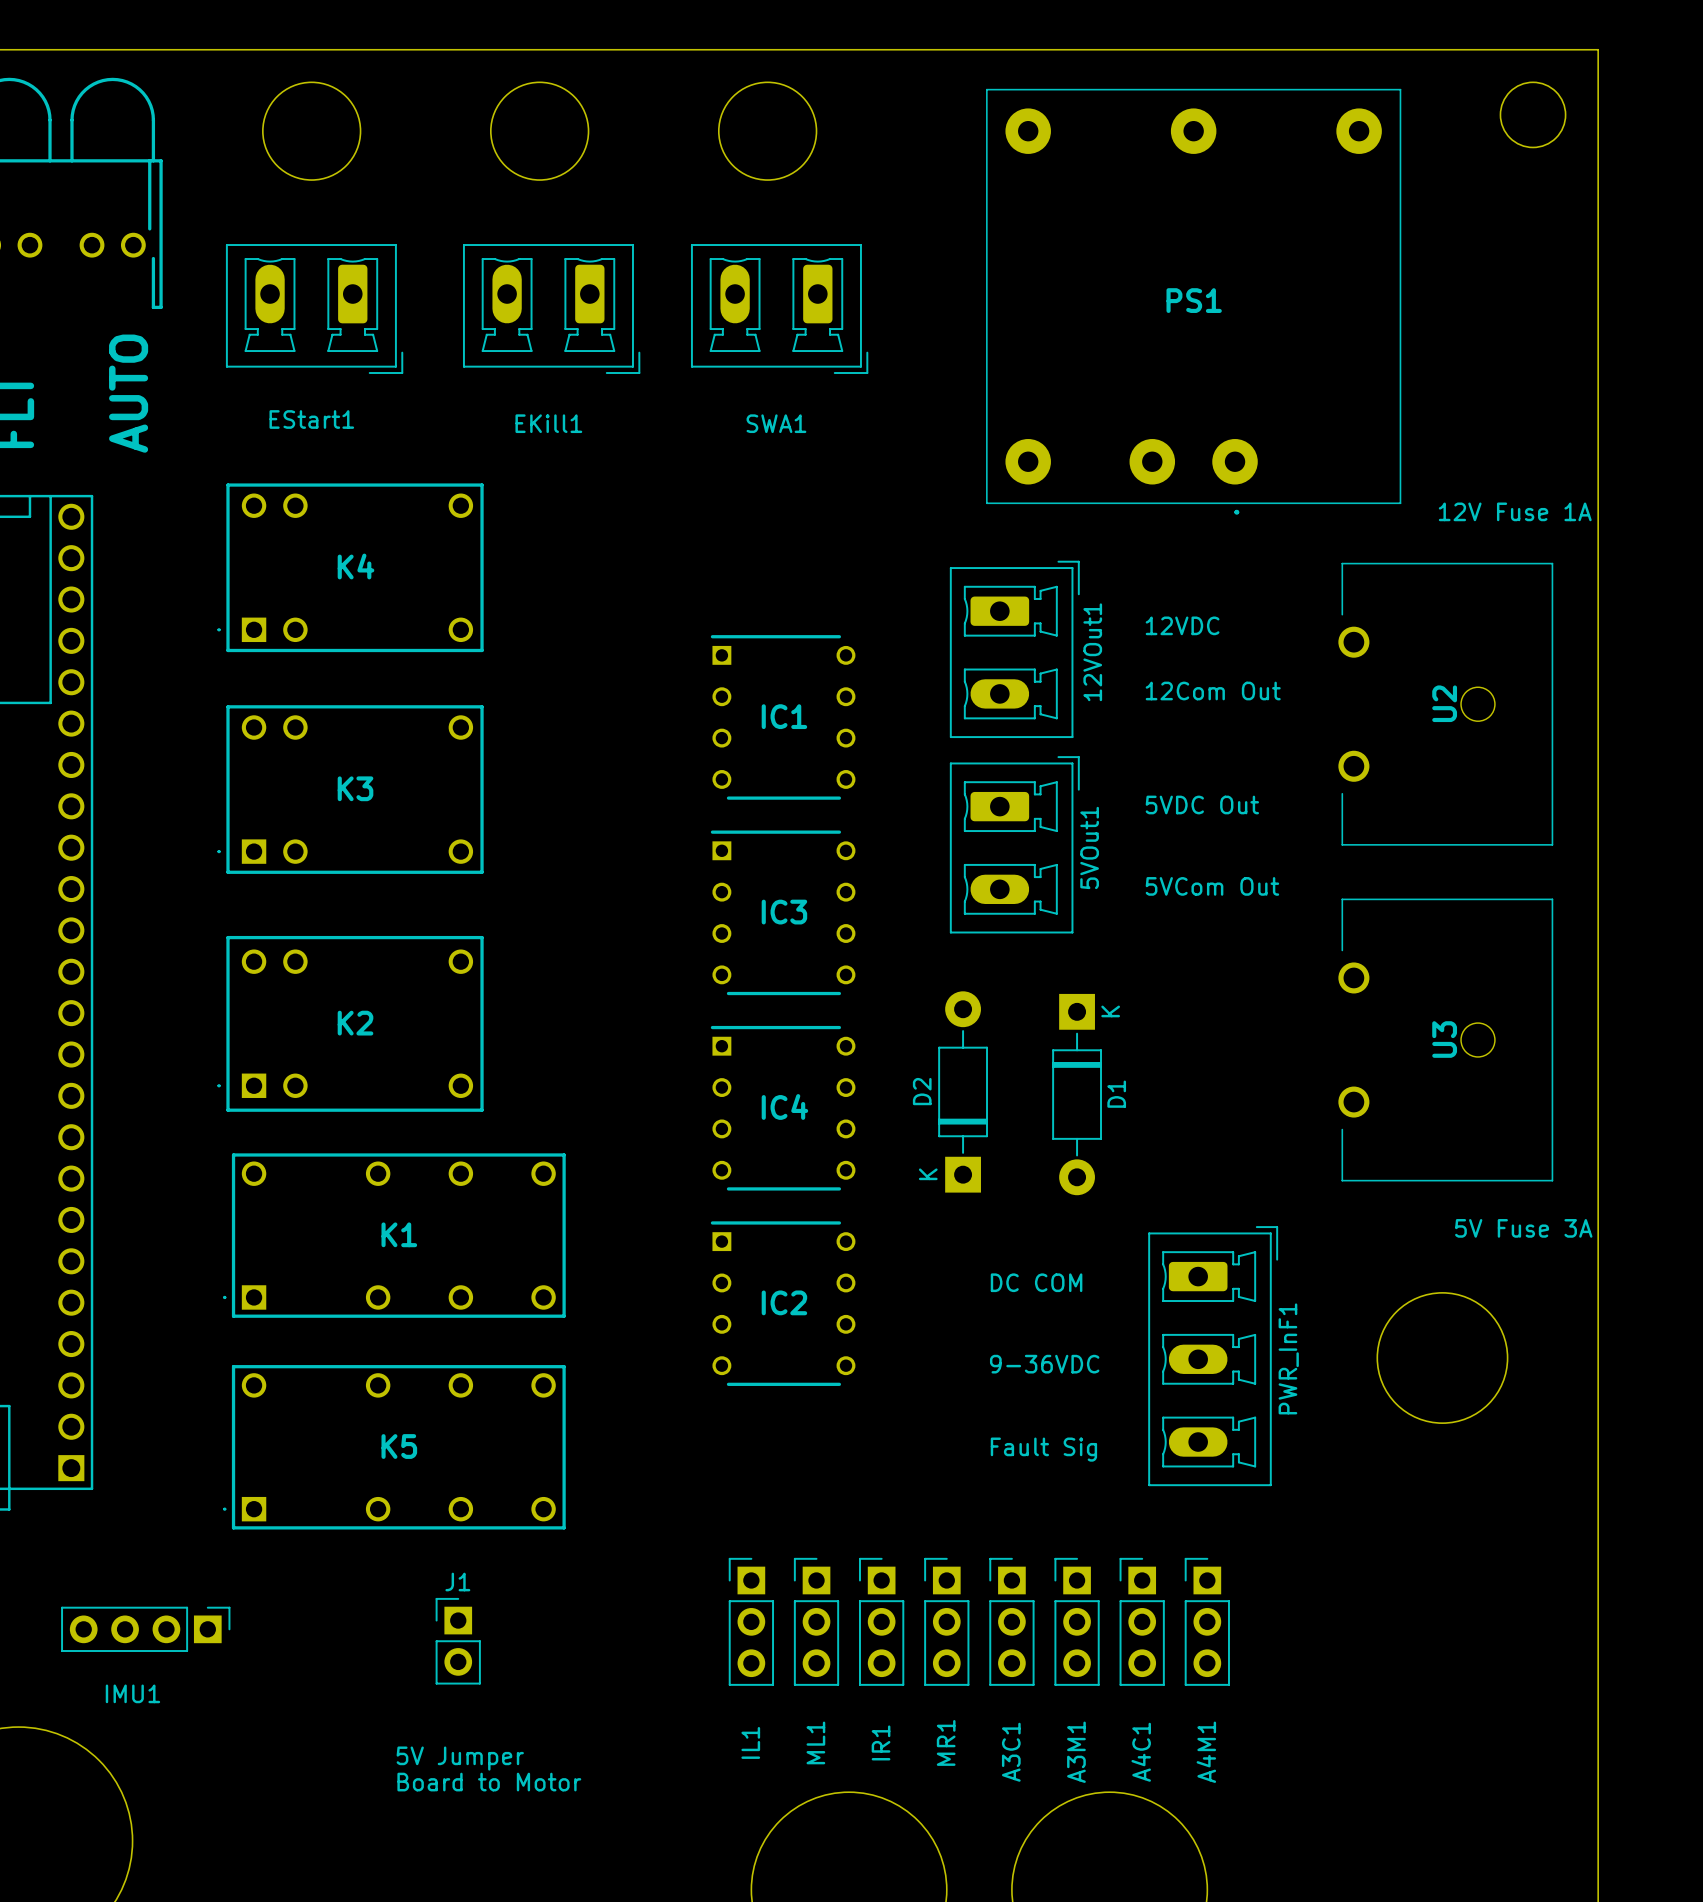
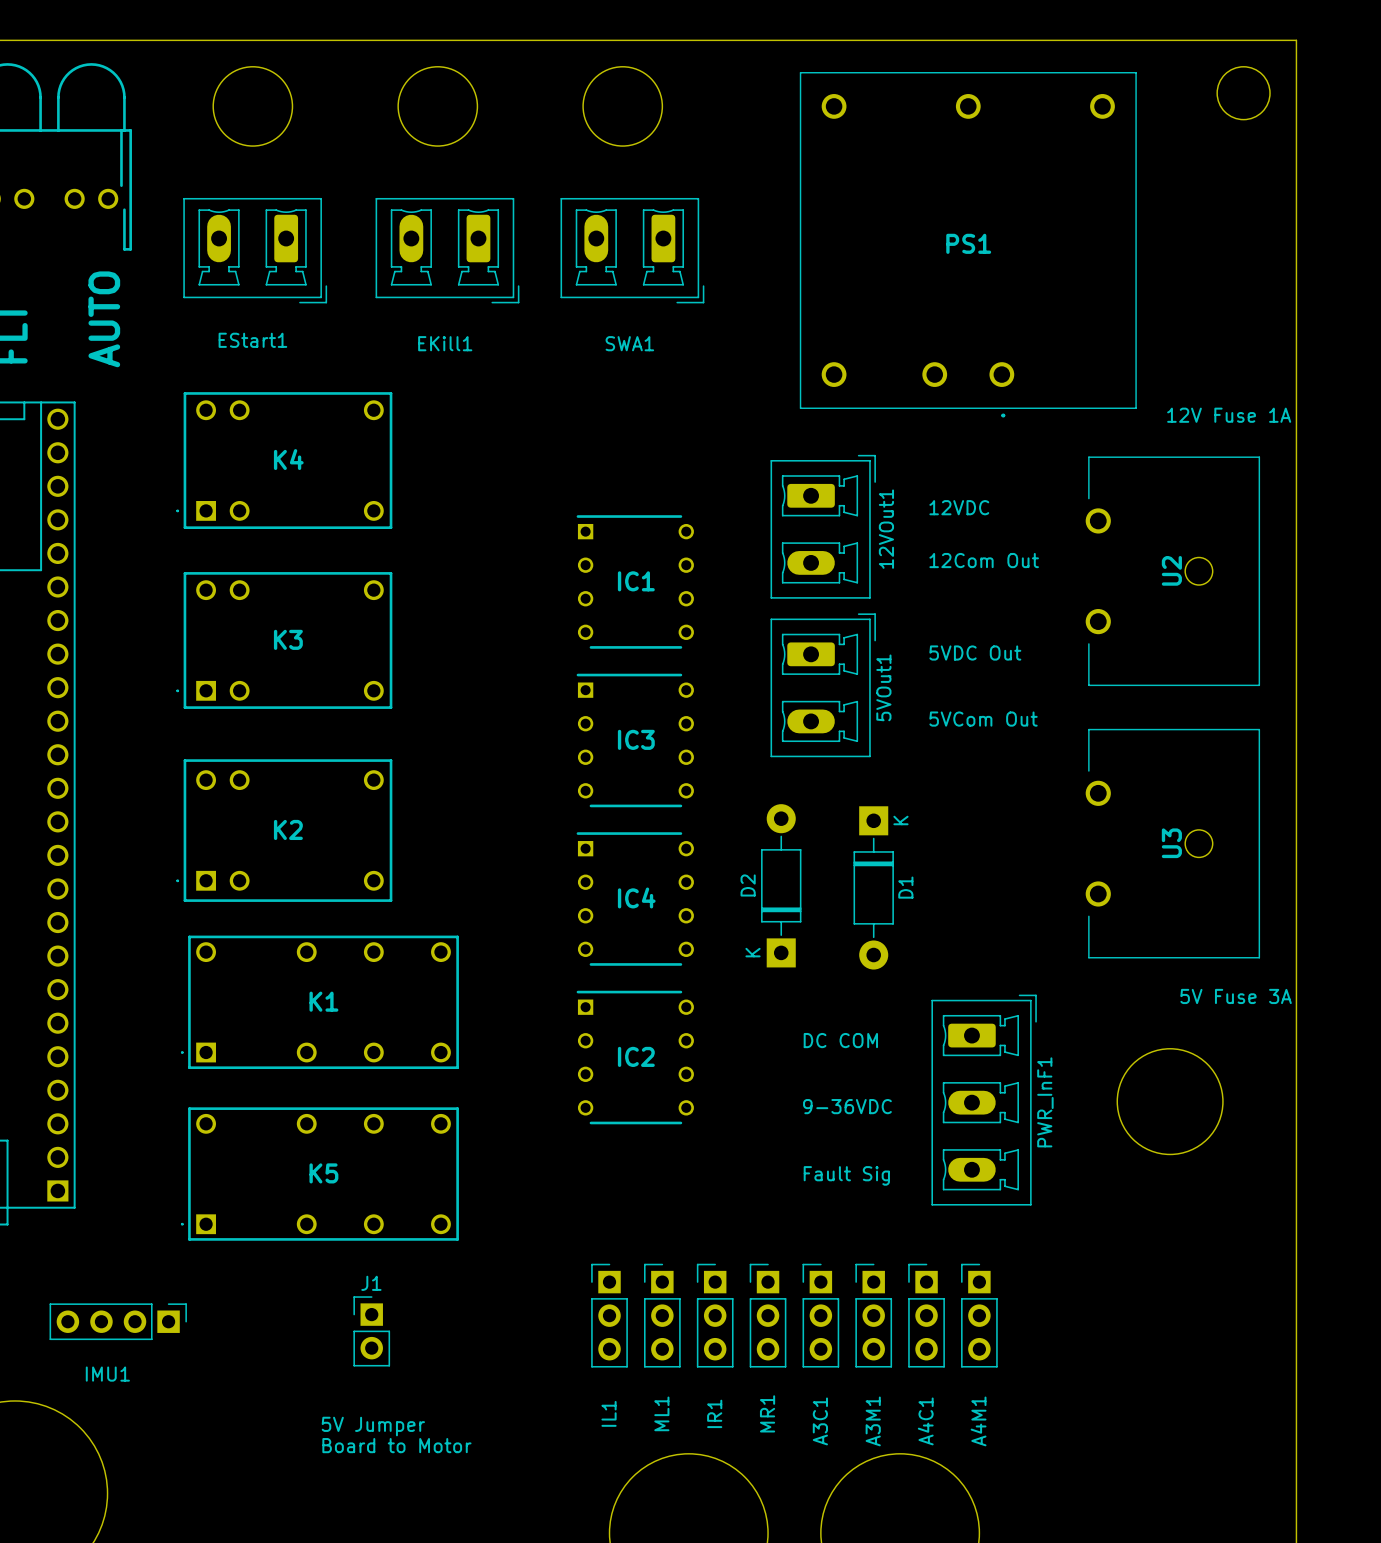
PS1 footprint: [986, 88, 1402, 515] -> [799, 72, 1137, 418]

